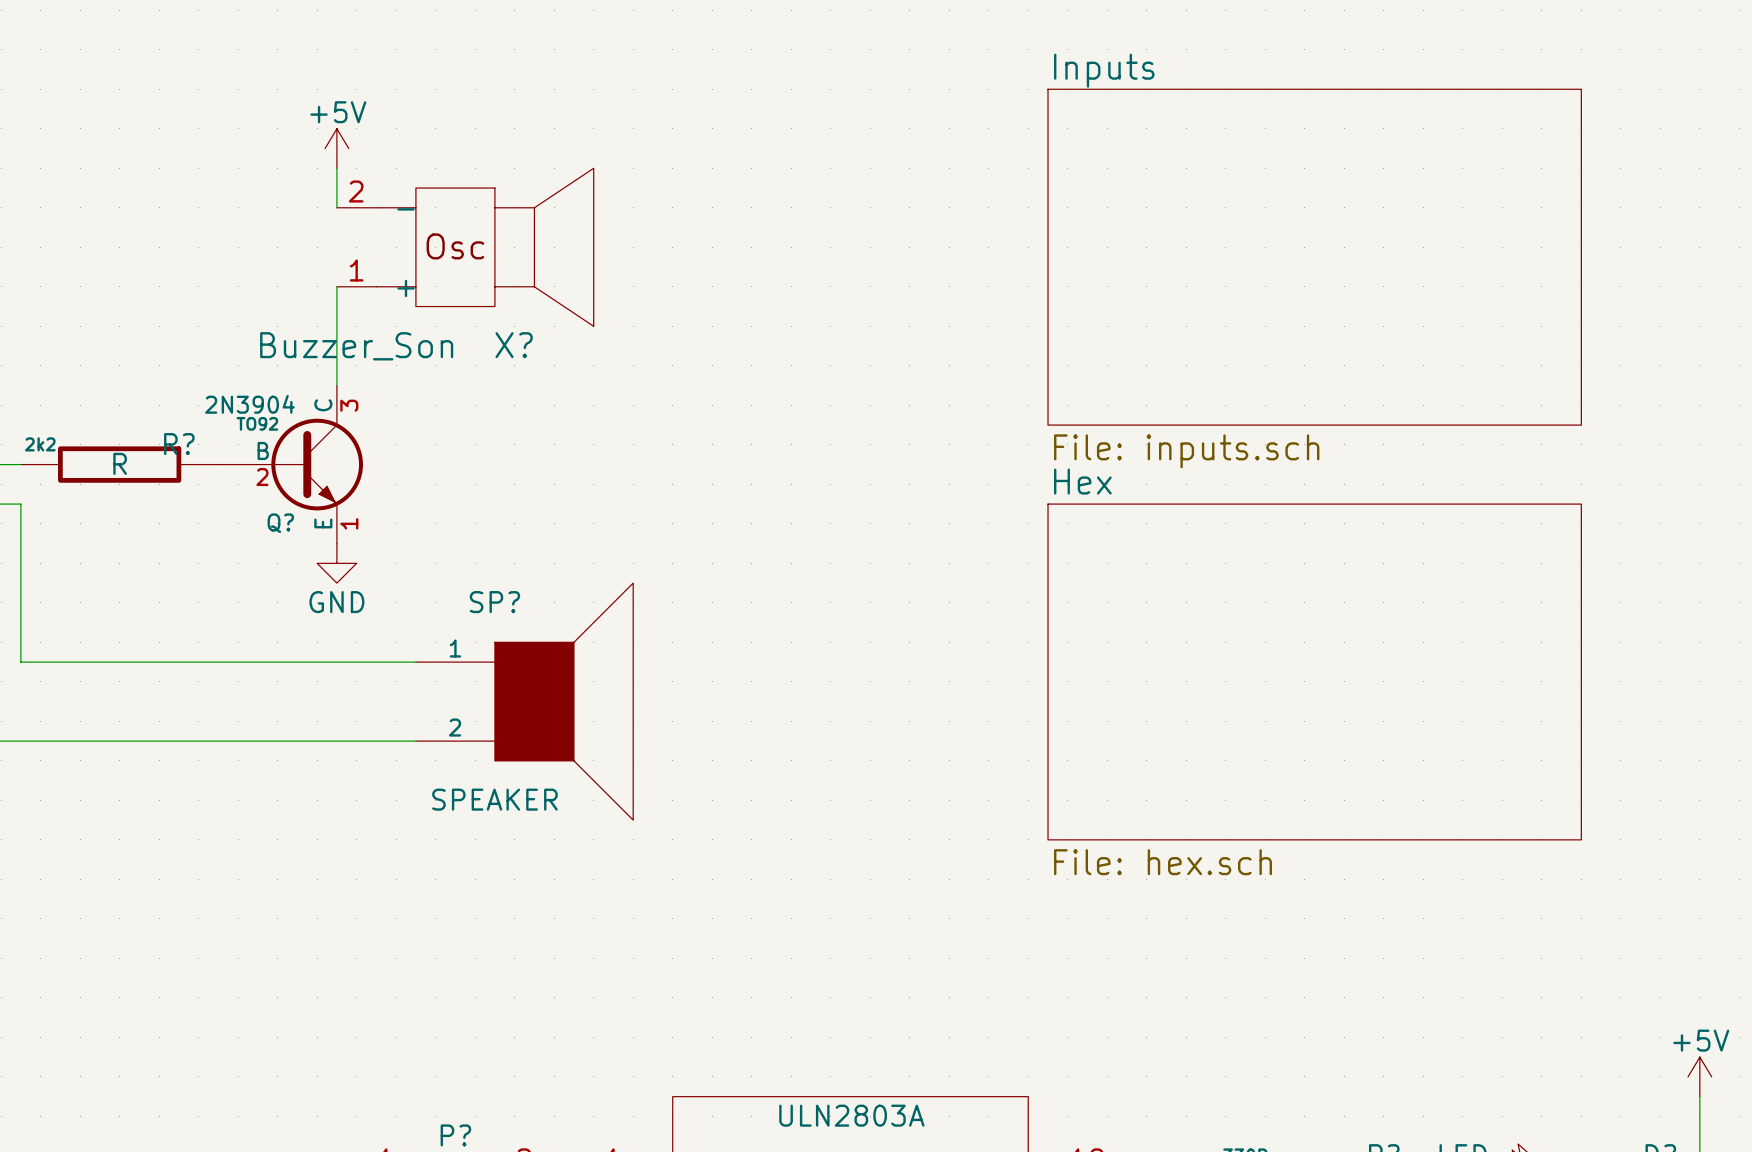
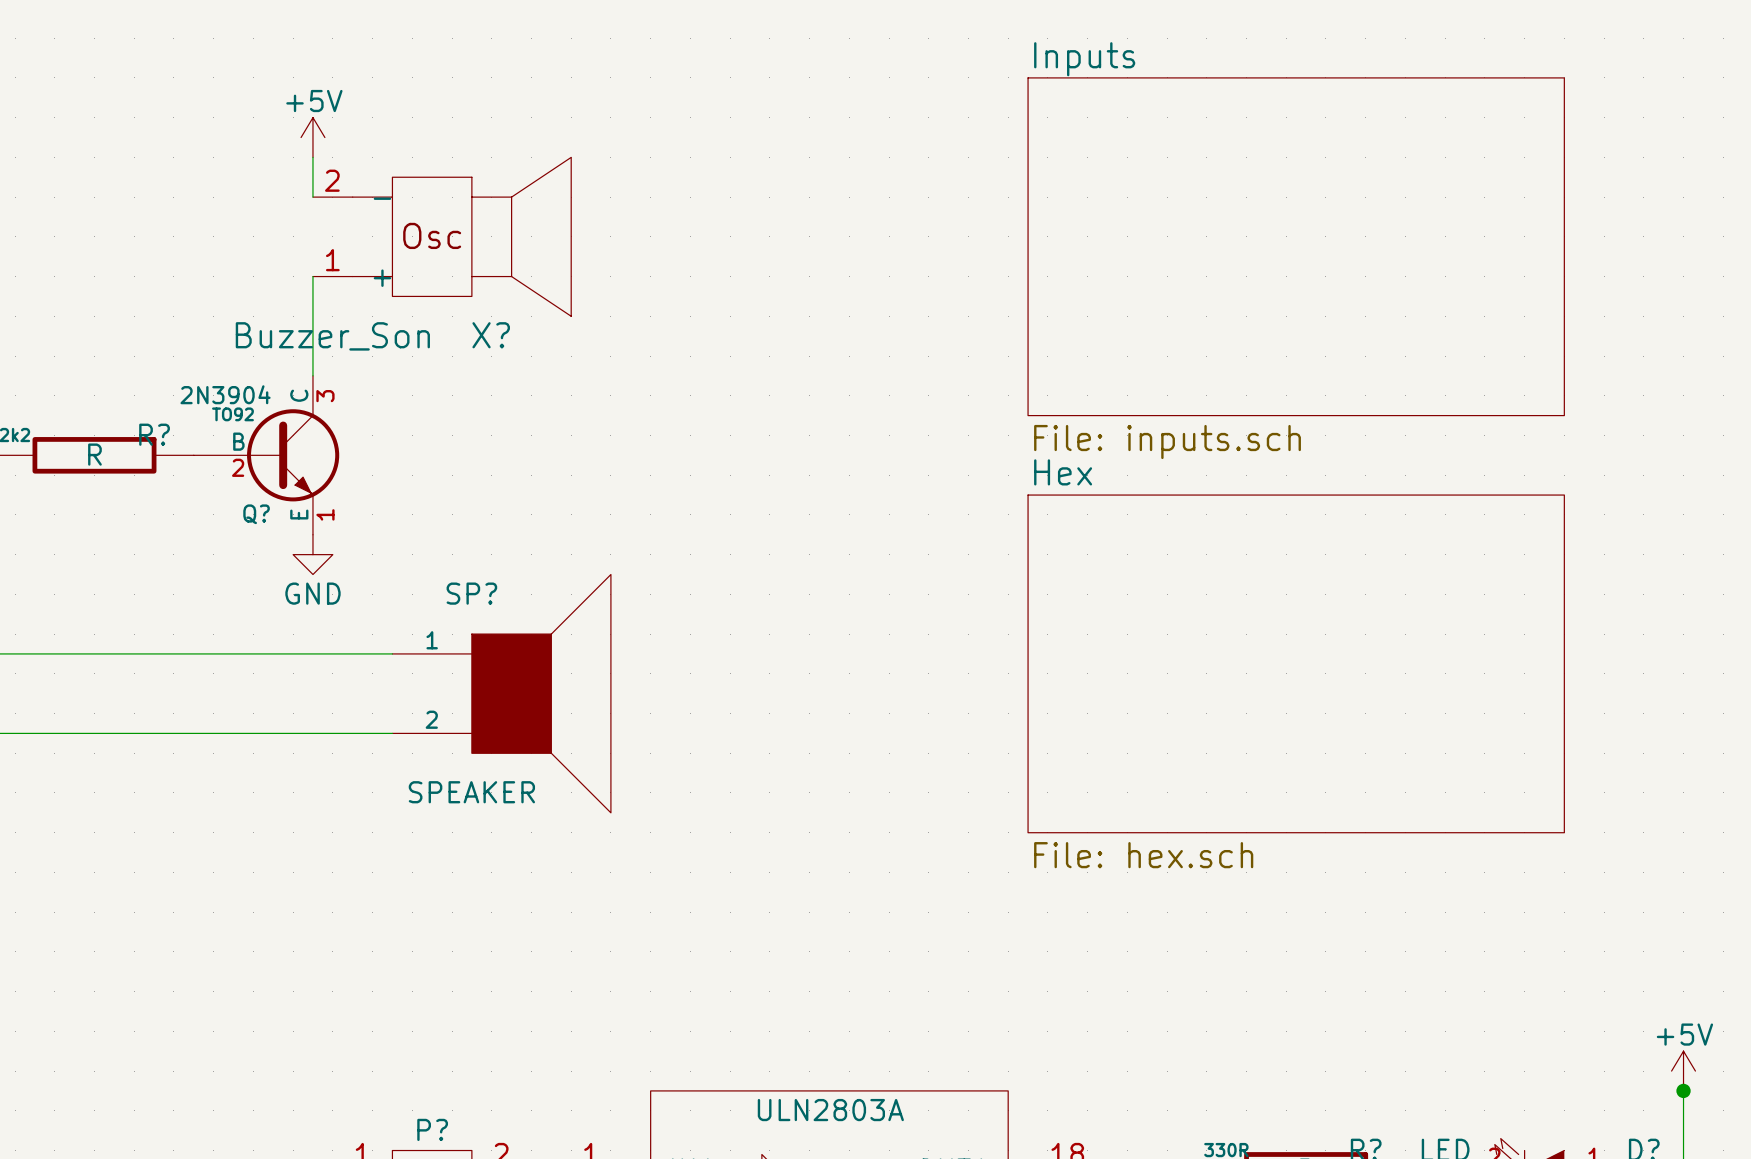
junction: none -> (1683, 1090)

